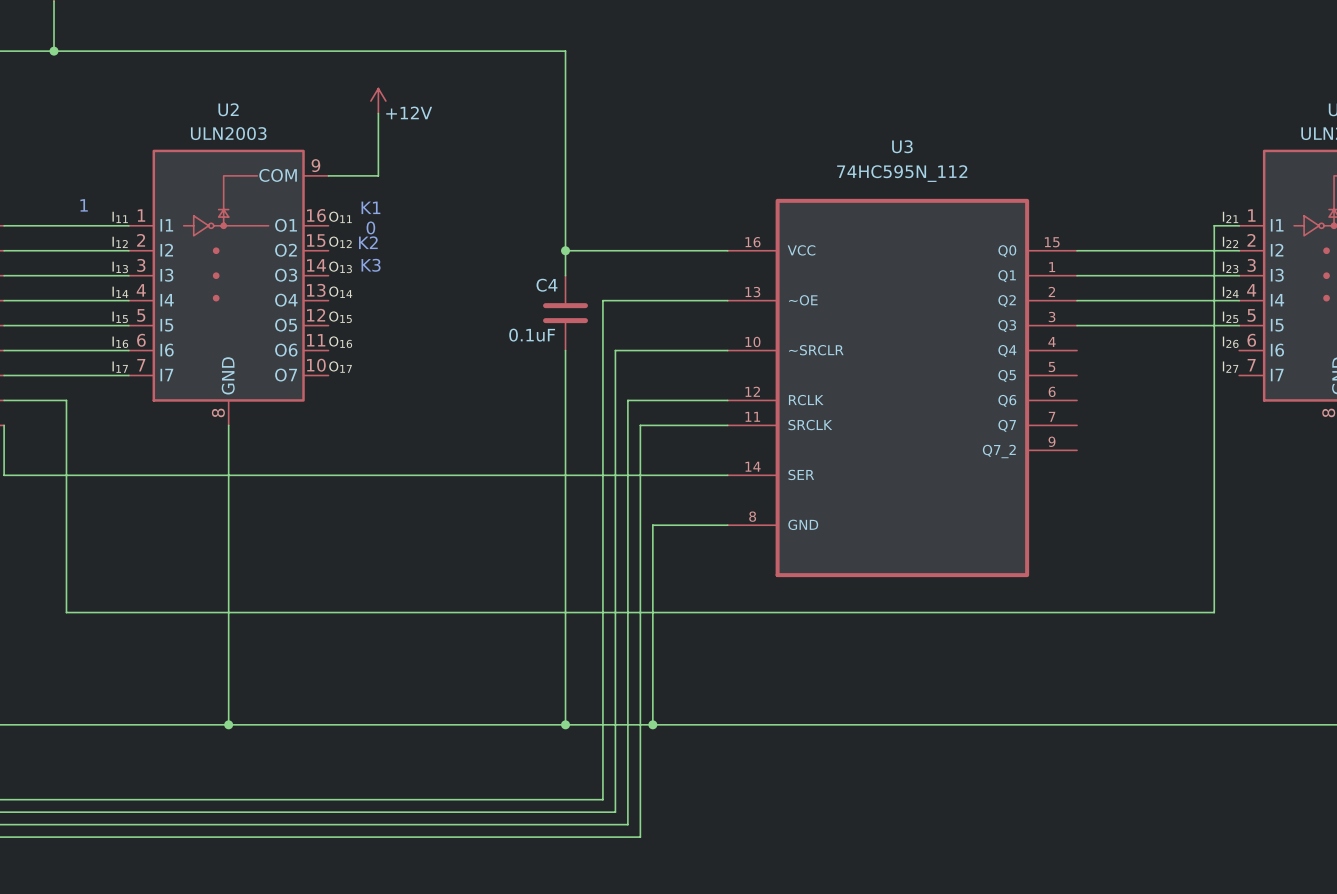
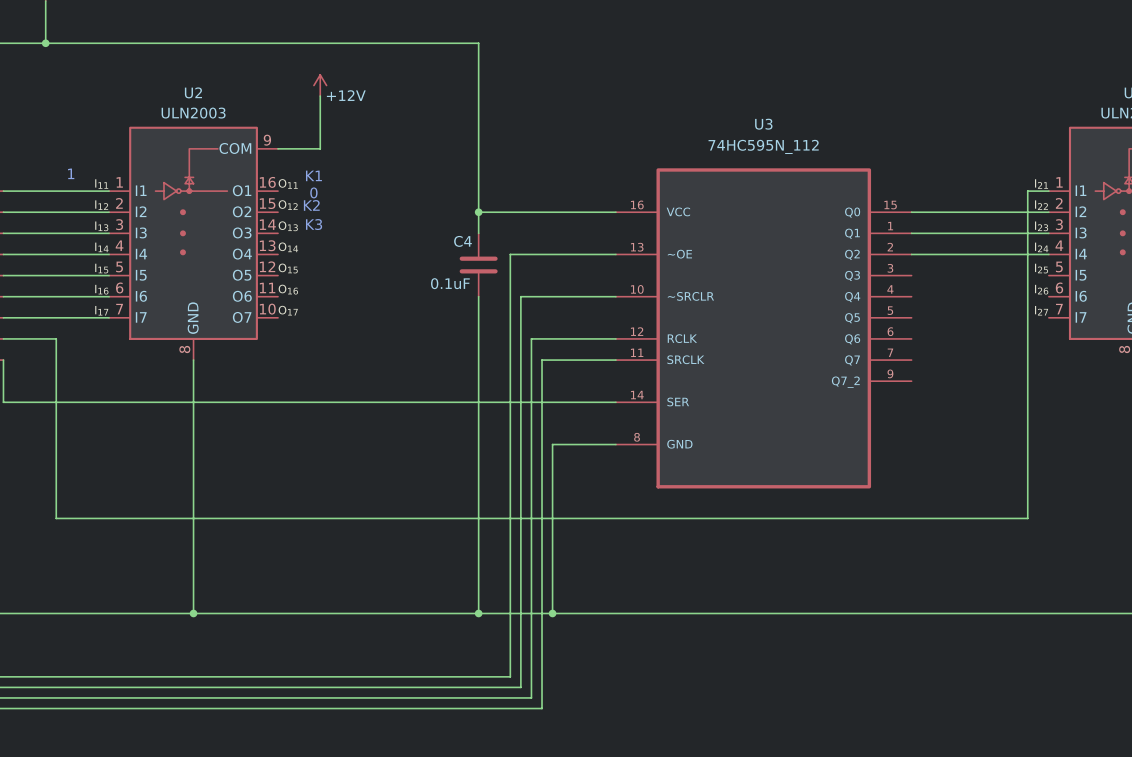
wire: (1077, 325) (1239, 325) -> none

